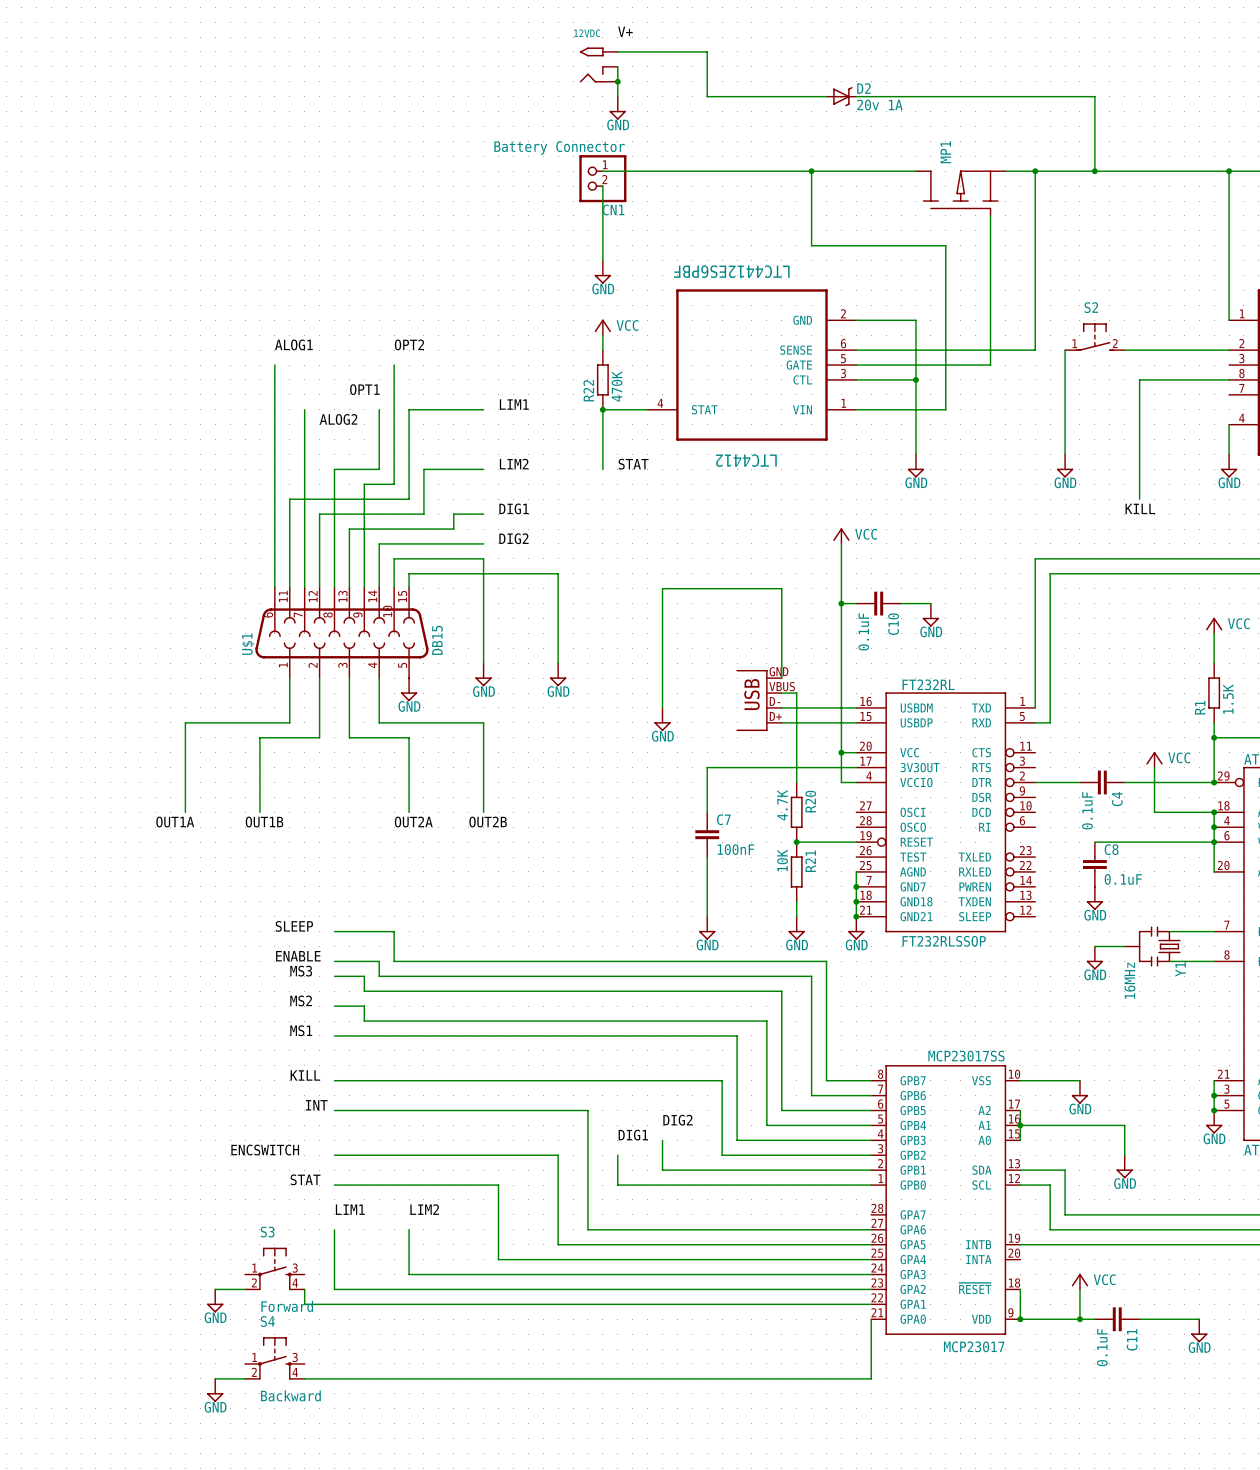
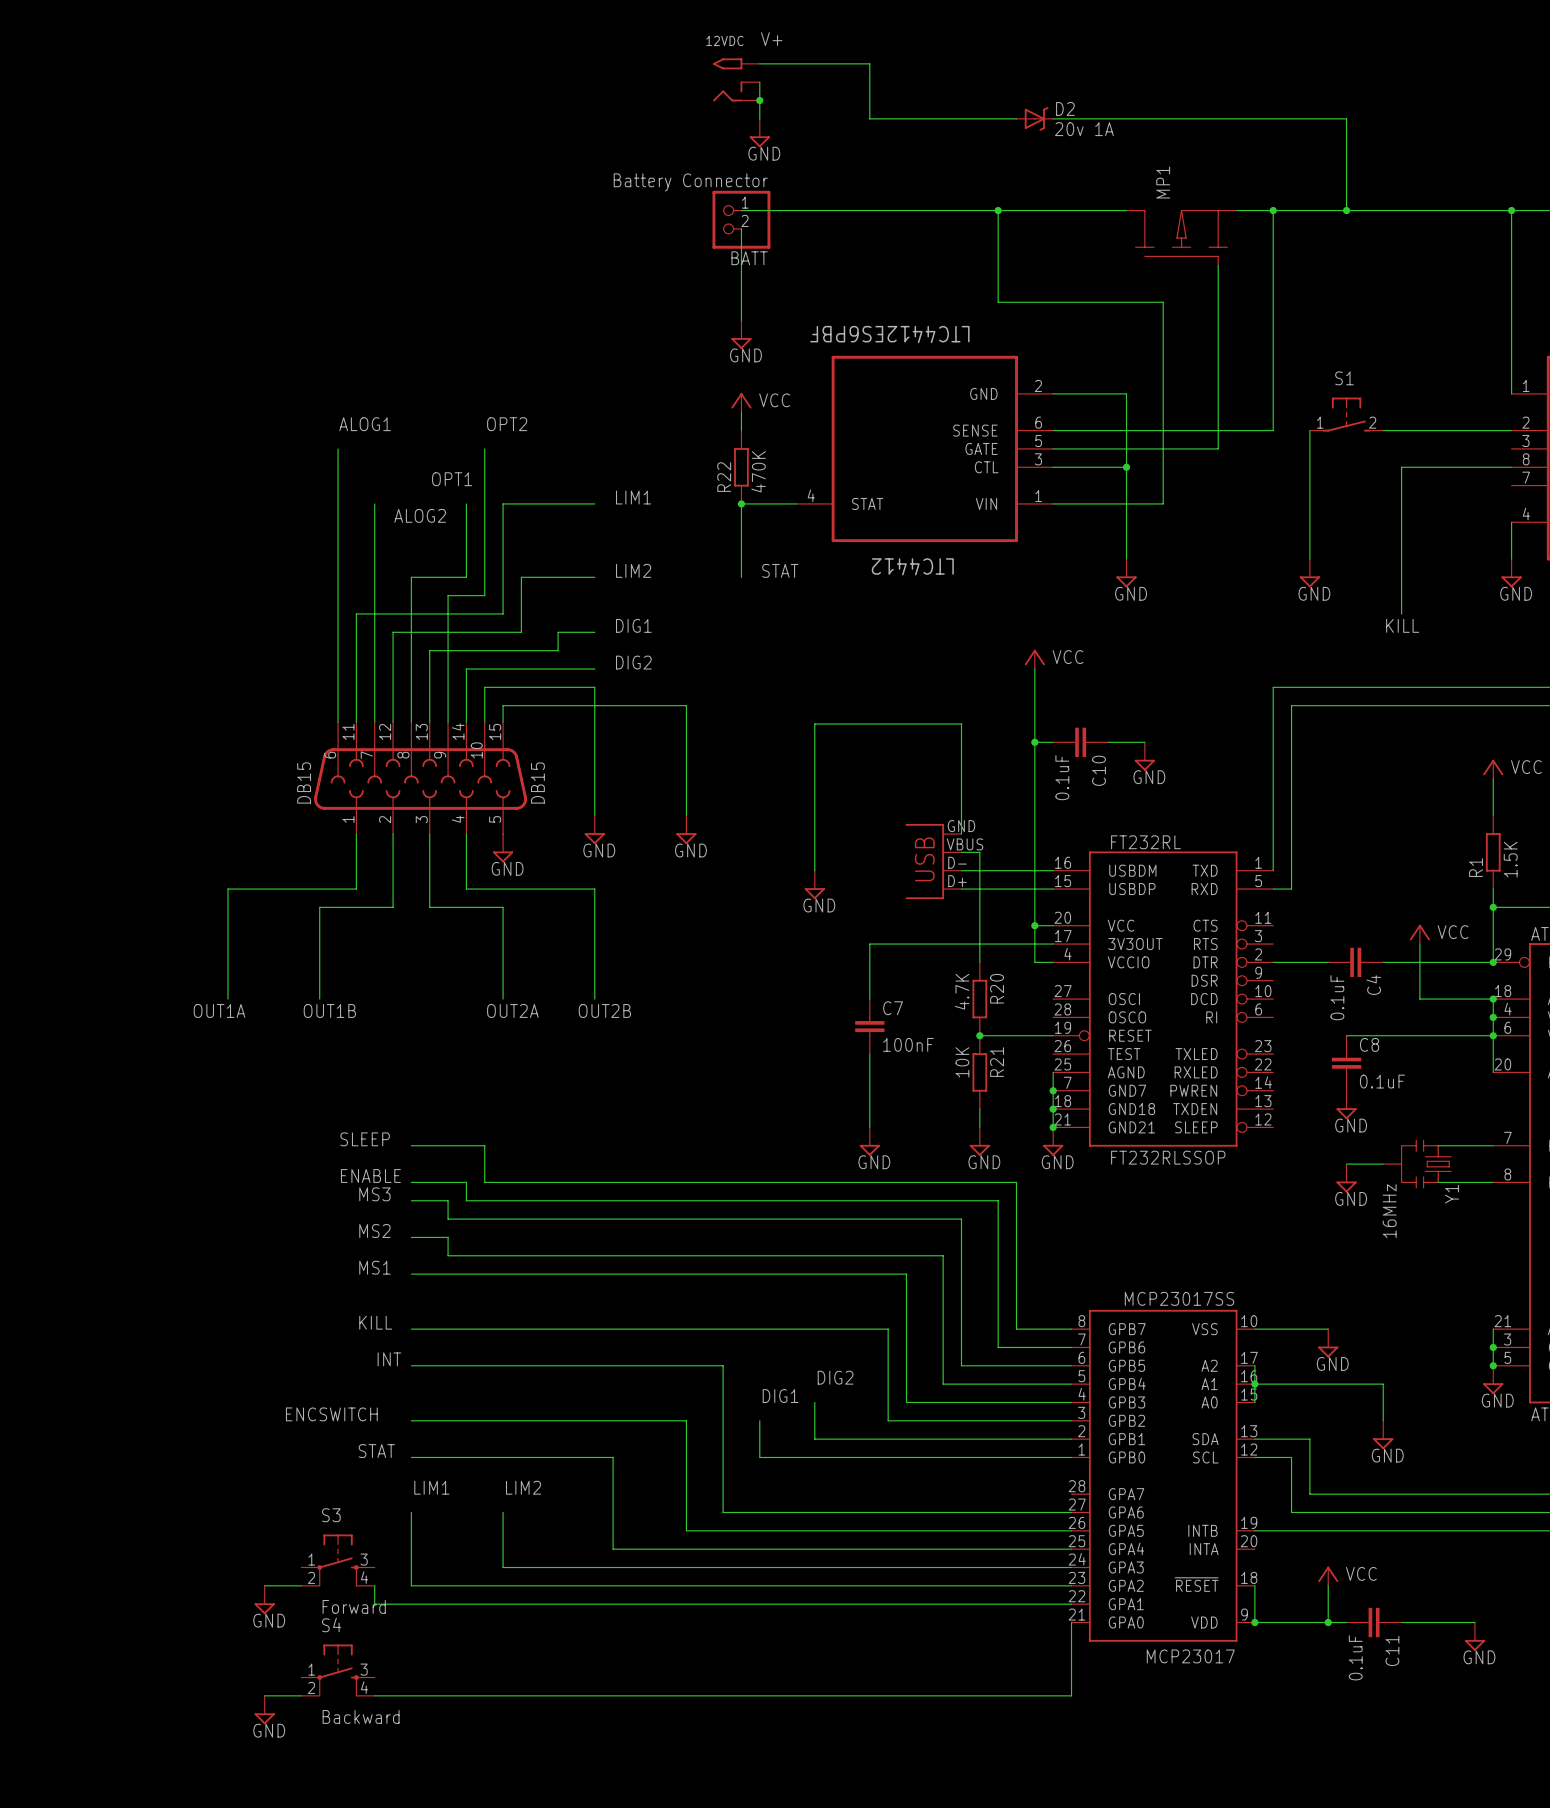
CN1 name: CN1 (613, 209) -> BATT (749, 258)
S2 name: S2 (1091, 307) -> S1 (1344, 378)
U$1 name: U$1 (248, 644) -> DB15 (304, 783)

